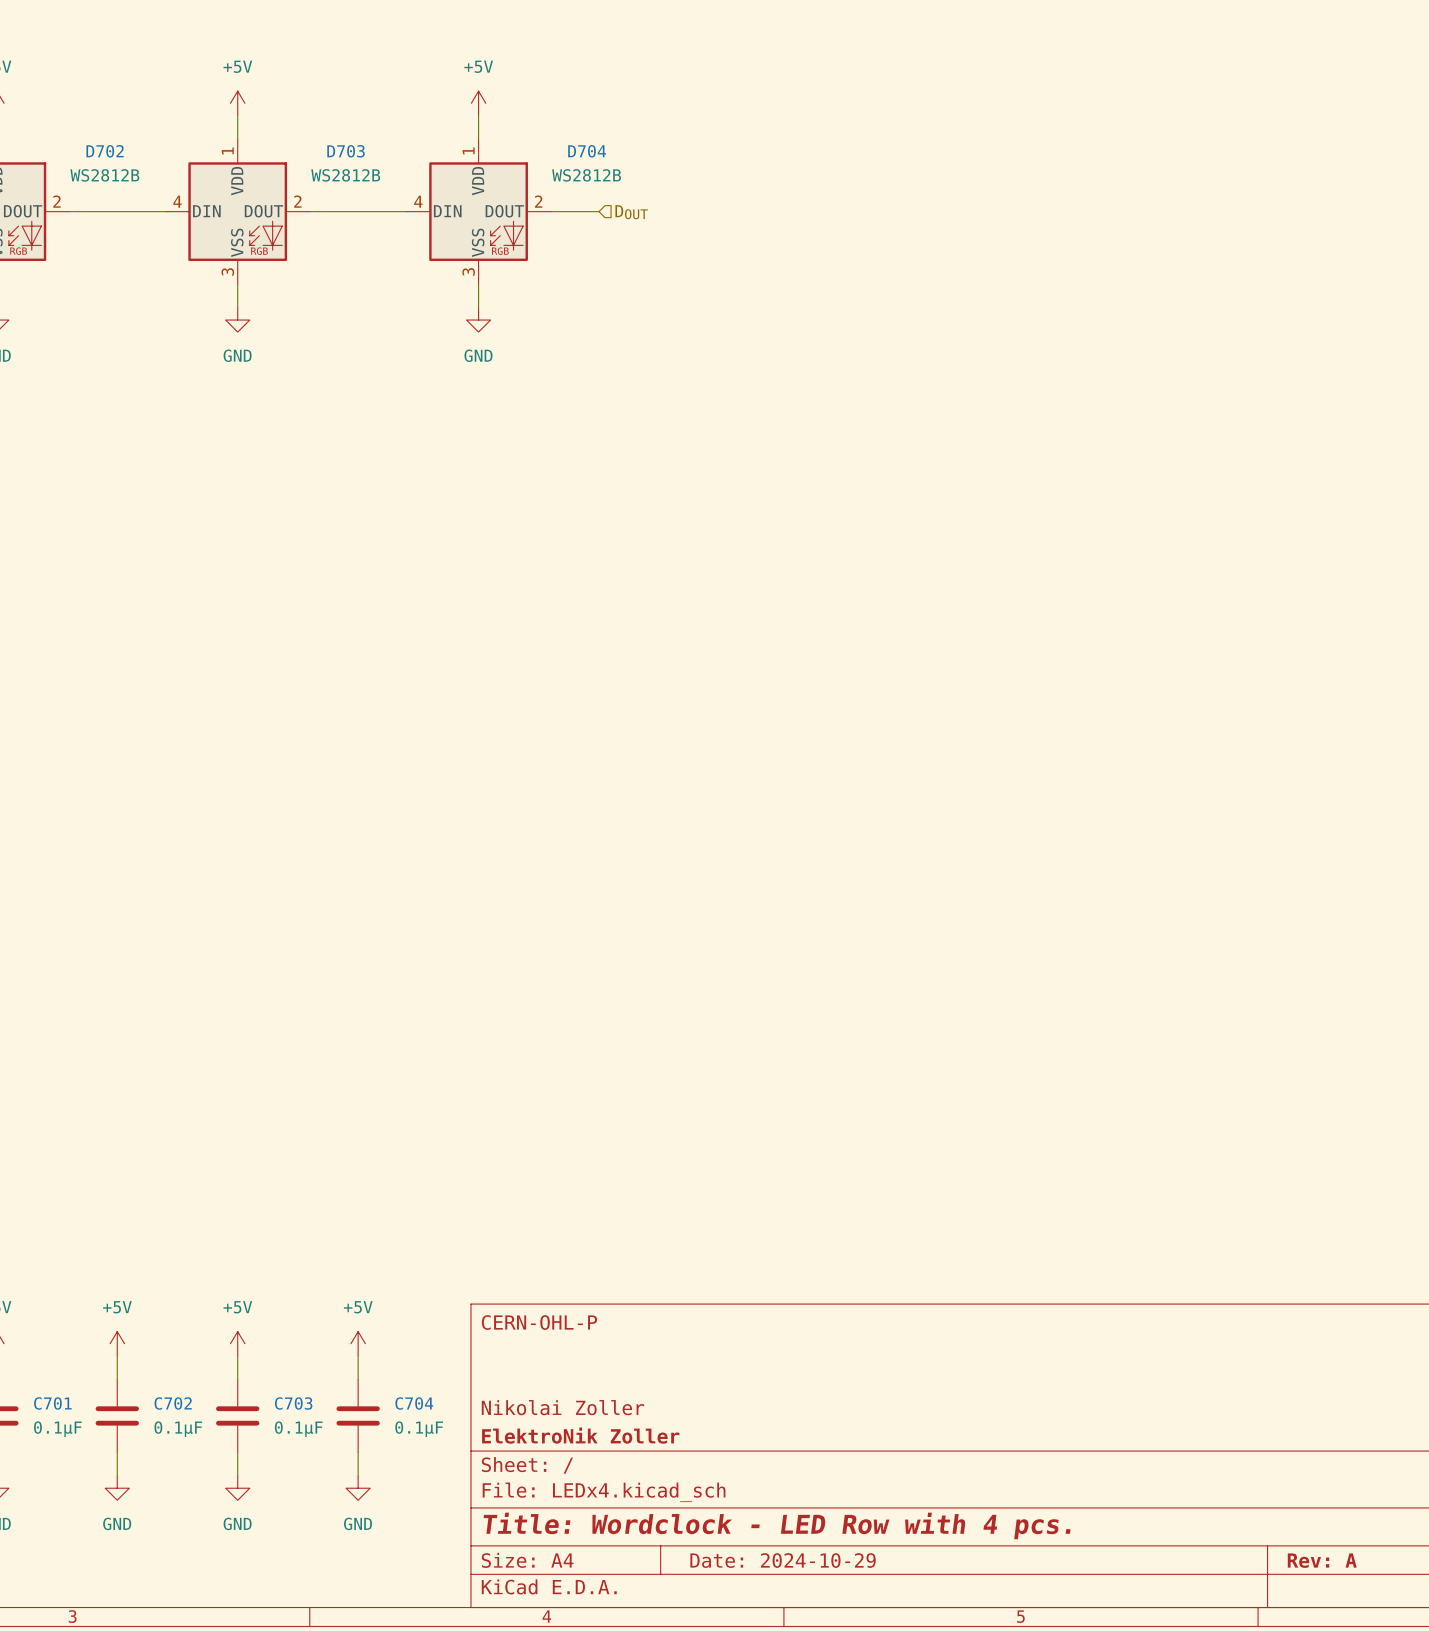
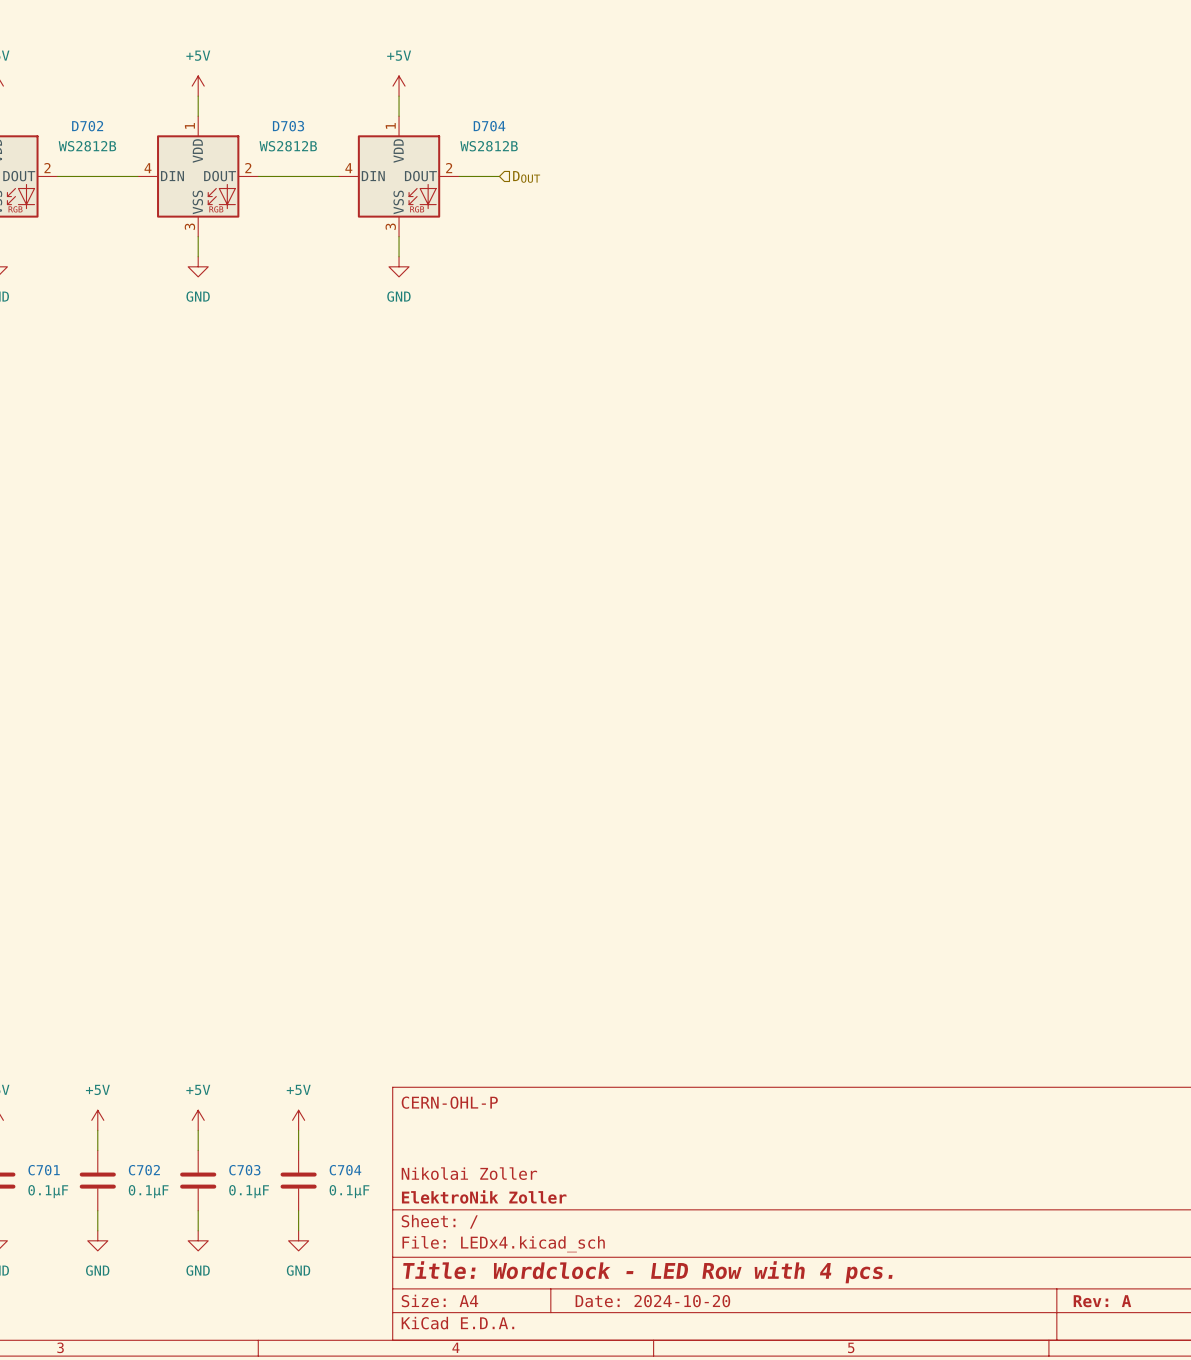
title block: Date: 2024-10-29 (783, 1560) -> Date: 2024-10-20 (652, 1301)

